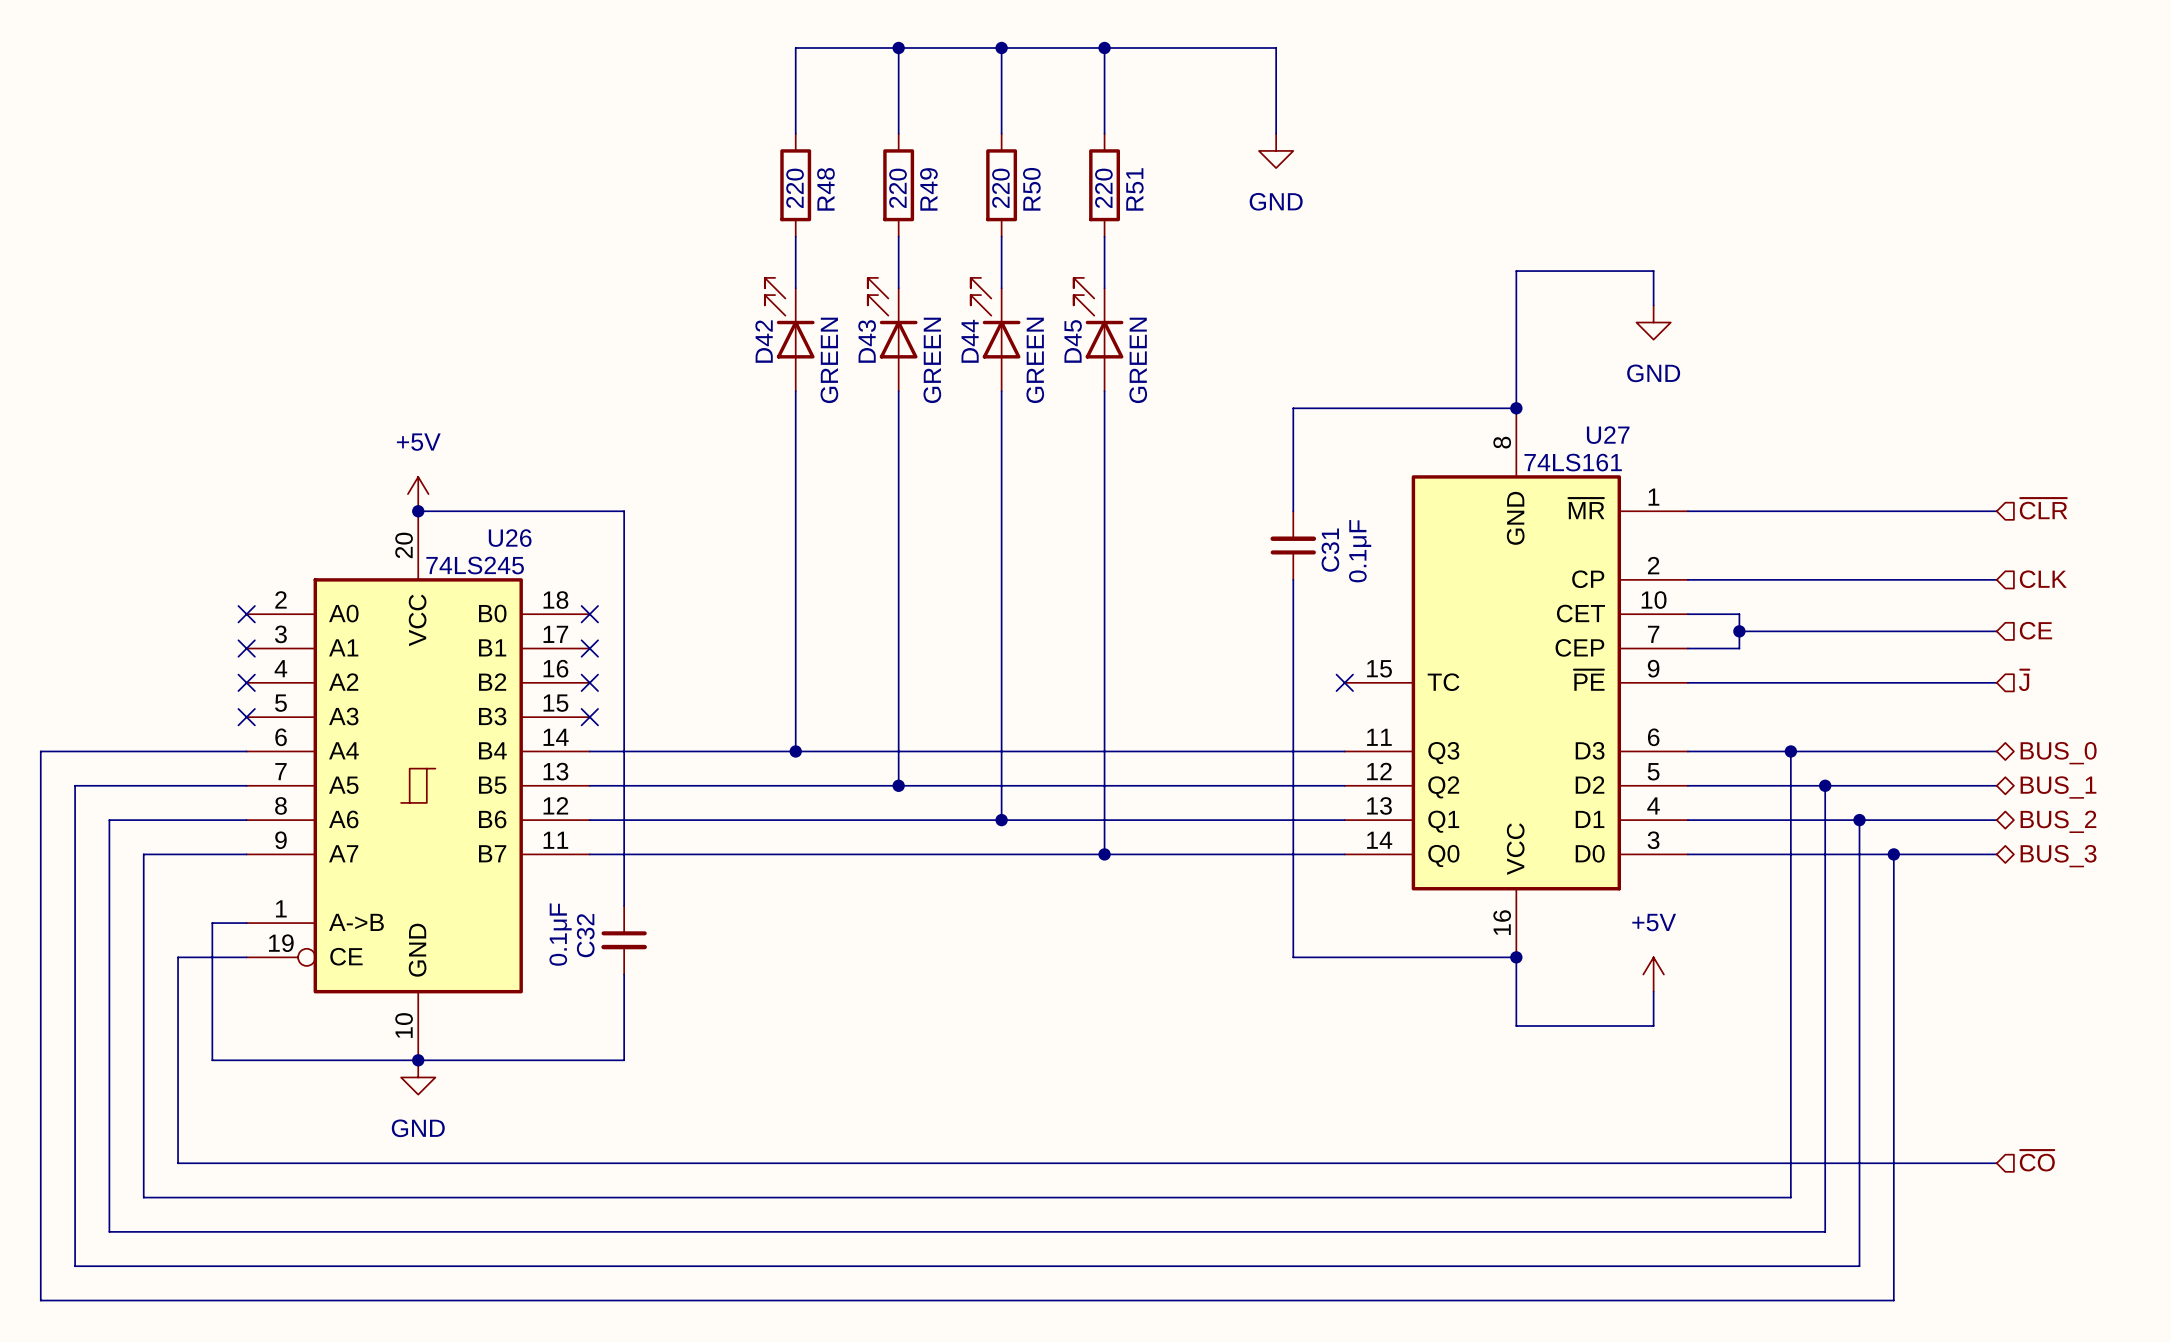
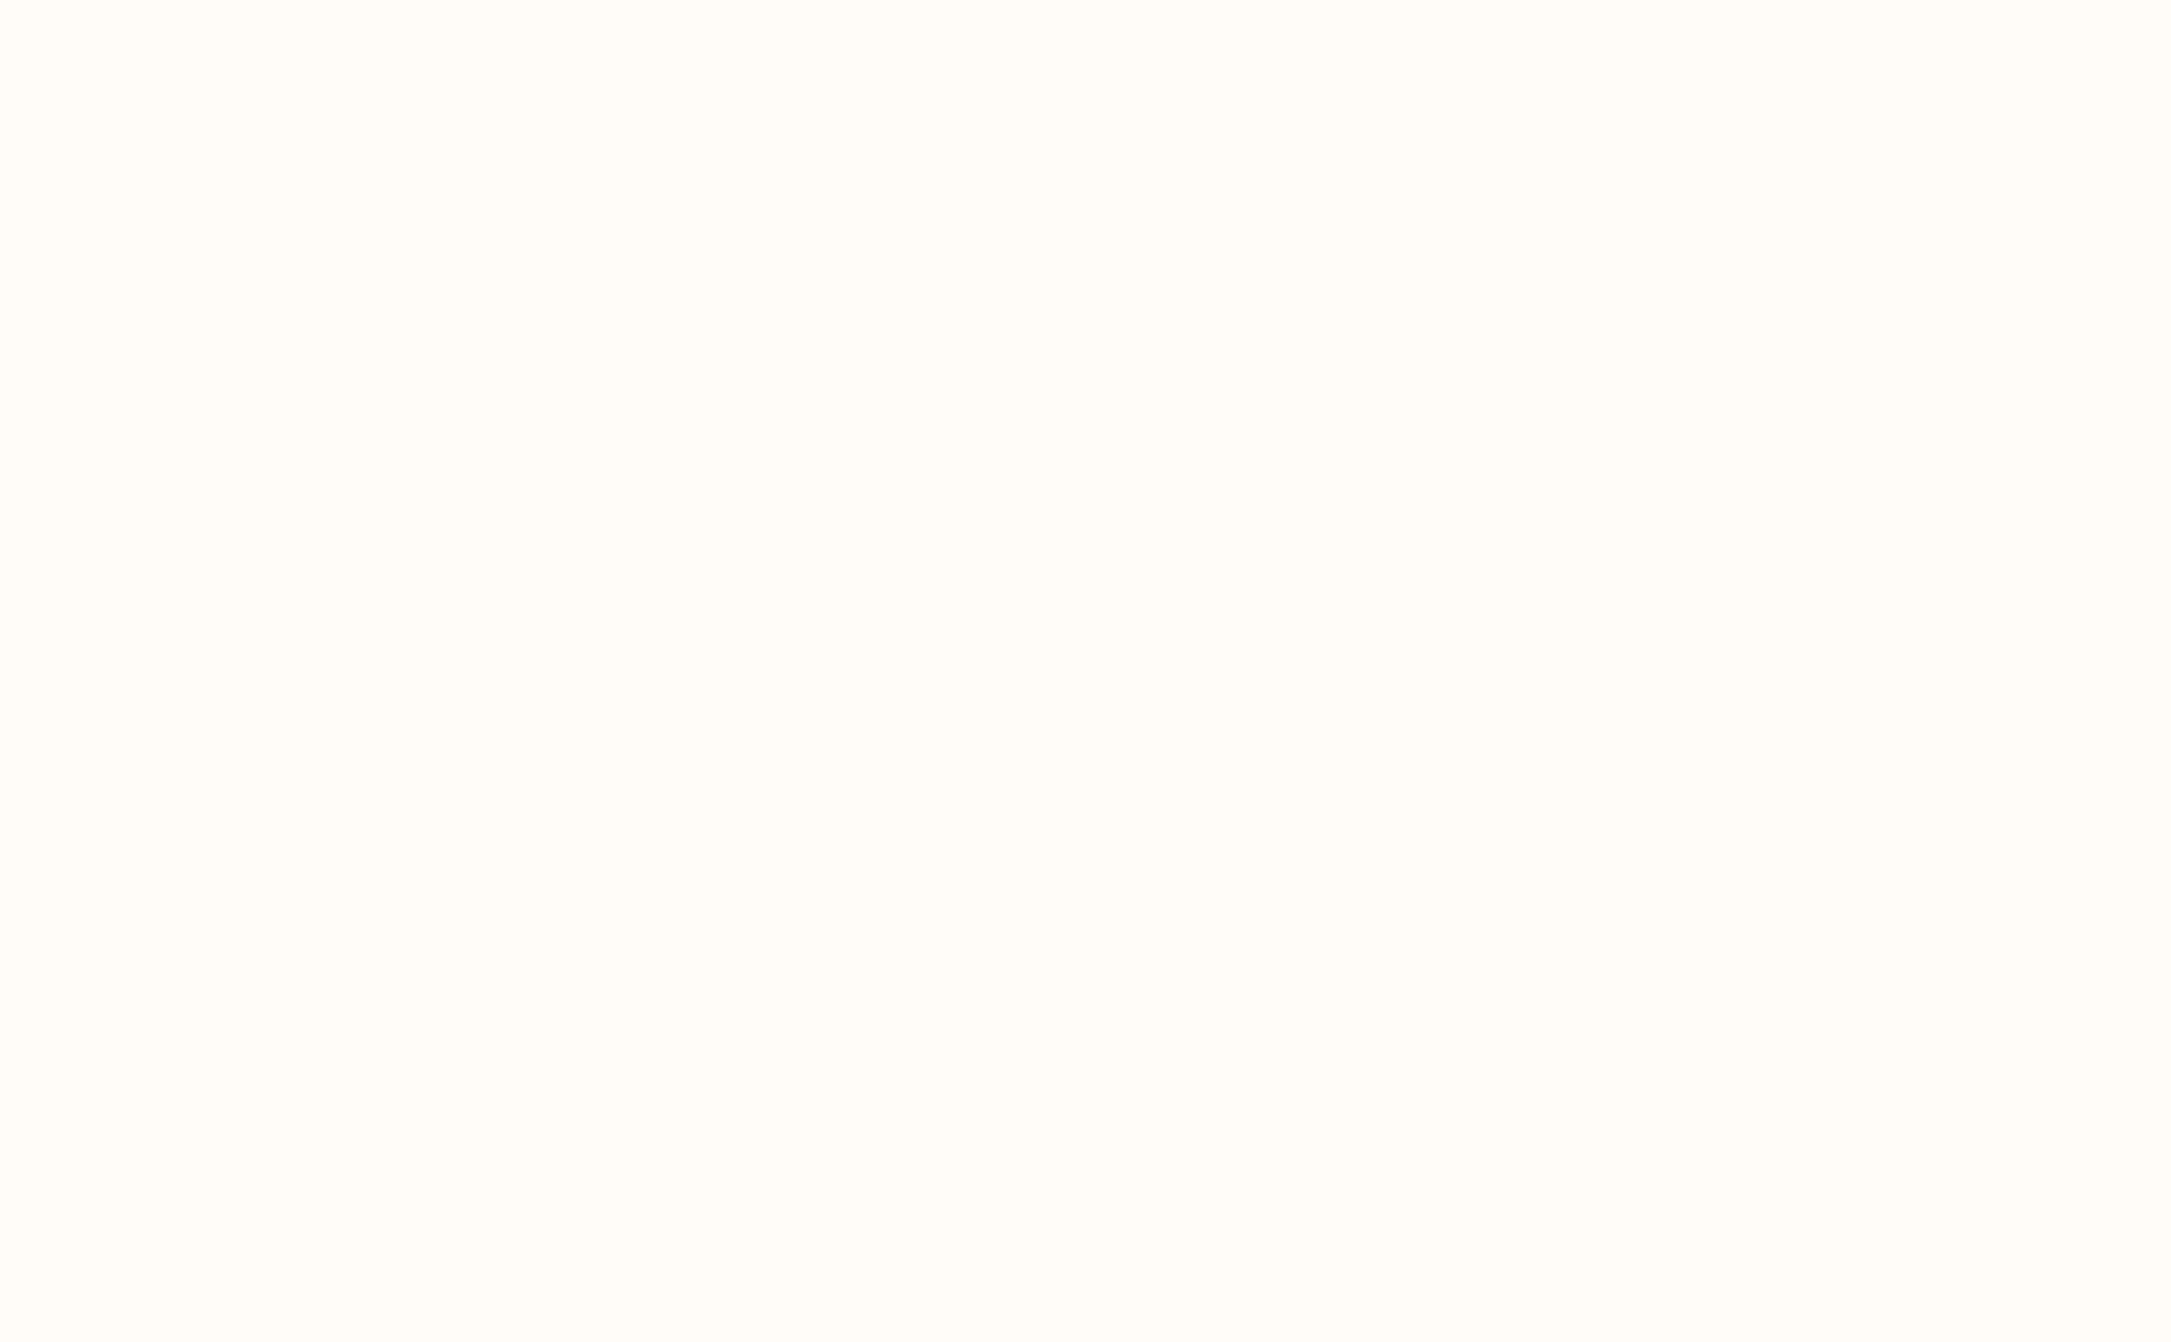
wire: (898, 47) (898, 133) -> none
junction: (898, 47) -> none
wire: (1001, 47) (1001, 133) -> none
junction: (1001, 47) -> none
wire: (1104, 47) (1104, 133) -> none
junction: (1104, 47) -> none
wire: (795, 133) (795, 47) (1276, 47) (1276, 133) -> none
power symbol: GND (1276, 150) -> none
R48: 220 (795, 185) -> none
R49: 220 (898, 185) -> none
R50: 220 (1001, 185) -> none
R51: 220 (1104, 185) -> none
wire: (795, 236) (795, 288) -> none
wire: (898, 236) (898, 288) -> none
wire: (1001, 236) (1001, 288) -> none
wire: (1104, 236) (1104, 288) -> none
wire: (1653, 305) (1653, 271) (1516, 271) (1516, 408) (1293, 408) (1293, 511) -> none
power symbol: GND (1653, 322) -> none
D42: GREEN (789, 334) -> none
D43: GREEN (892, 334) -> none
D44: GREEN (995, 334) -> none
D45: GREEN (1098, 334) -> none
wire: (795, 391) (795, 751) -> none
wire: (898, 391) (898, 785) -> none
wire: (1001, 391) (1001, 820) -> none
wire: (1104, 391) (1104, 854) -> none
junction: (1516, 408) -> none
power symbol: +5V (418, 494) -> none
hierarchical label: ~{CLR} (2043, 508) -> none
wire: (418, 511) (624, 511) (624, 905) -> none
junction: (418, 511) -> none
wire: (1687, 511) (1996, 511) -> none
C31: 0.1μF (1293, 545) -> none
wire: (1293, 579) (1293, 957) (1516, 957) (1516, 1025) (1653, 1025) (1653, 991) -> none
wire: (1687, 579) (1996, 579) -> none
hierarchical label: CLK (2043, 579) -> none
no-connect mark: (246, 614) -> none
no-connect mark: (589, 614) -> none
wire: (1687, 614) (1739, 614) (1739, 648) (1687, 648) -> none
hierarchical label: CE (2035, 630) -> none
wire: (1739, 631) (1996, 631) -> none
junction: (1739, 631) -> none
no-connect mark: (246, 648) -> none
no-connect mark: (589, 648) -> none
hierarchical label: ~{J} (2024, 680) -> none
no-connect mark: (246, 682) -> none
no-connect mark: (589, 682) -> none
no-connect mark: (1344, 682) -> none
U27: 74LS161 (1516, 682) -> none
wire: (1687, 682) (1996, 682) -> none
no-connect mark: (246, 717) -> none
no-connect mark: (589, 717) -> none
wire: (246, 751) (40, 751) (40, 1300) (1893, 1300) (1893, 854) -> none
wire: (589, 751) (1344, 751) -> none
junction: (795, 751) -> none
wire: (1687, 751) (1996, 751) -> none
wire: (1790, 751) (1790, 1197) (143, 1197) (143, 854) (246, 854) -> none
junction: (1790, 751) -> none
hierarchical label: BUS_0 (2058, 753) -> none
wire: (246, 785) (75, 785) (75, 1266) (1859, 1266) (1859, 820) -> none
U26: 74LS245 (418, 785) -> none
wire: (589, 785) (1344, 785) -> none
junction: (898, 785) -> none
wire: (1687, 785) (1996, 785) -> none
wire: (1825, 785) (1825, 1231) (109, 1231) (109, 820) (246, 820) -> none
junction: (1825, 785) -> none
hierarchical label: BUS_1 (2058, 787) -> none
wire: (589, 820) (1344, 820) -> none
junction: (1001, 820) -> none
wire: (1687, 820) (1996, 820) -> none
junction: (1859, 820) -> none
hierarchical label: BUS_2 (2058, 821) -> none
wire: (589, 854) (1344, 854) -> none
junction: (1104, 854) -> none
wire: (1687, 854) (1996, 854) -> none
junction: (1893, 854) -> none
hierarchical label: BUS_3 (2058, 856) -> none
wire: (246, 923) (212, 923) (212, 1060) (624, 1060) (624, 974) -> none
C32: 0.1μF (624, 940) -> none
wire: (246, 957) (178, 957) (178, 1163) (1996, 1163) -> none
junction: (1516, 957) -> none
power symbol: +5V (1653, 974) -> none
junction: (418, 1060) -> none
power symbol: GND (418, 1077) -> none
hierarchical label: ~{CO} (2037, 1160) -> none

